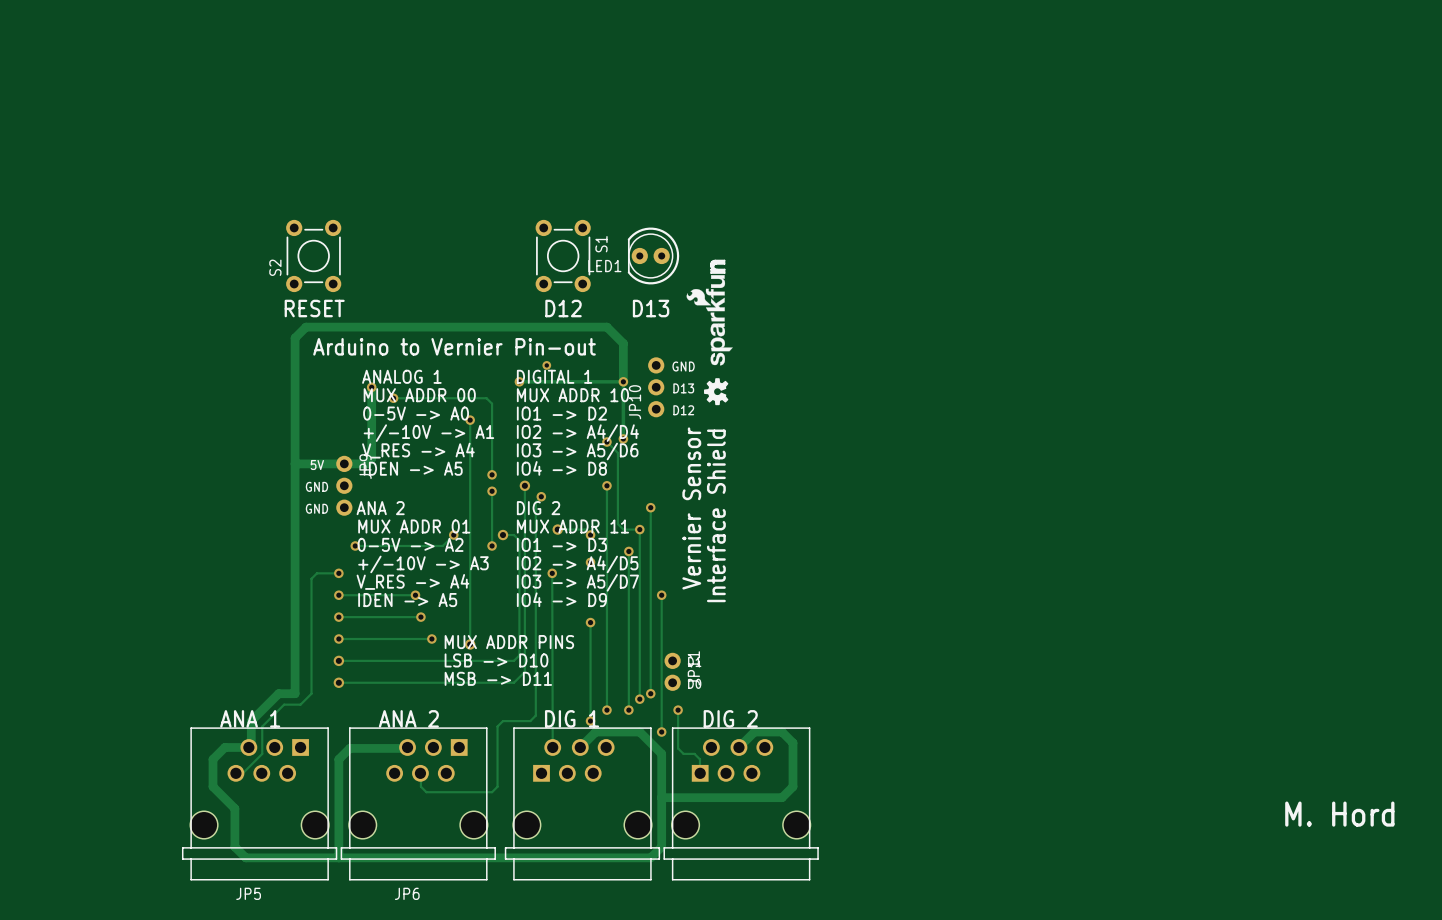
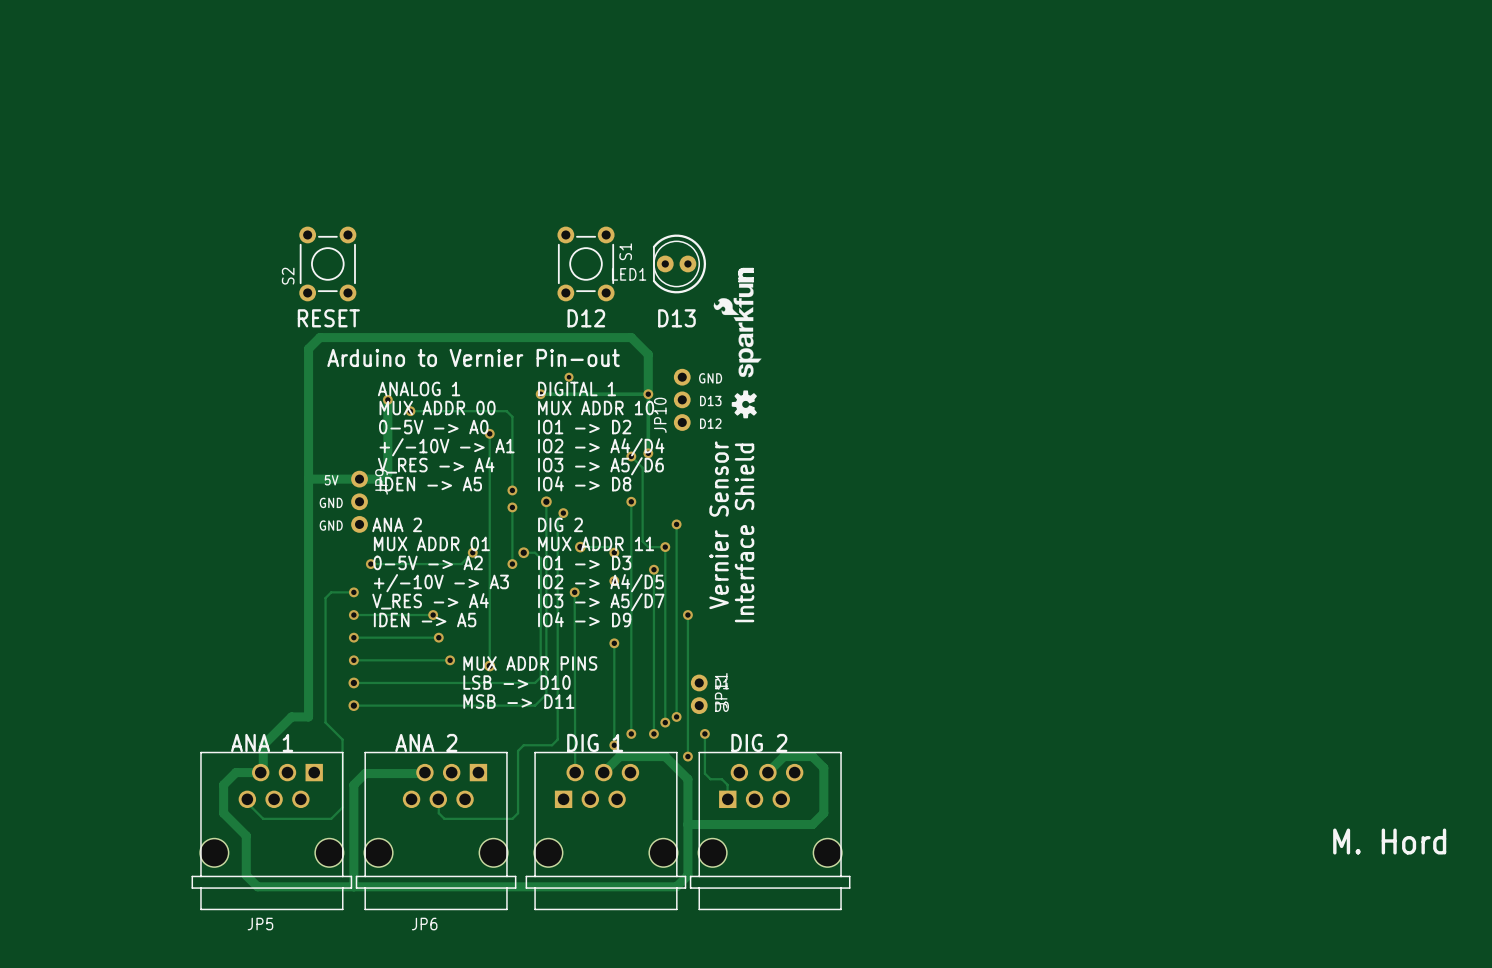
track: (311, 693) (300, 704) (284, 704) (262, 726) (262, 753) (242, 773) (235, 773) -> (325, 716) (325, 722) (342, 739) (342, 807) (331, 818) (263, 818) (247, 802) (247, 799)

